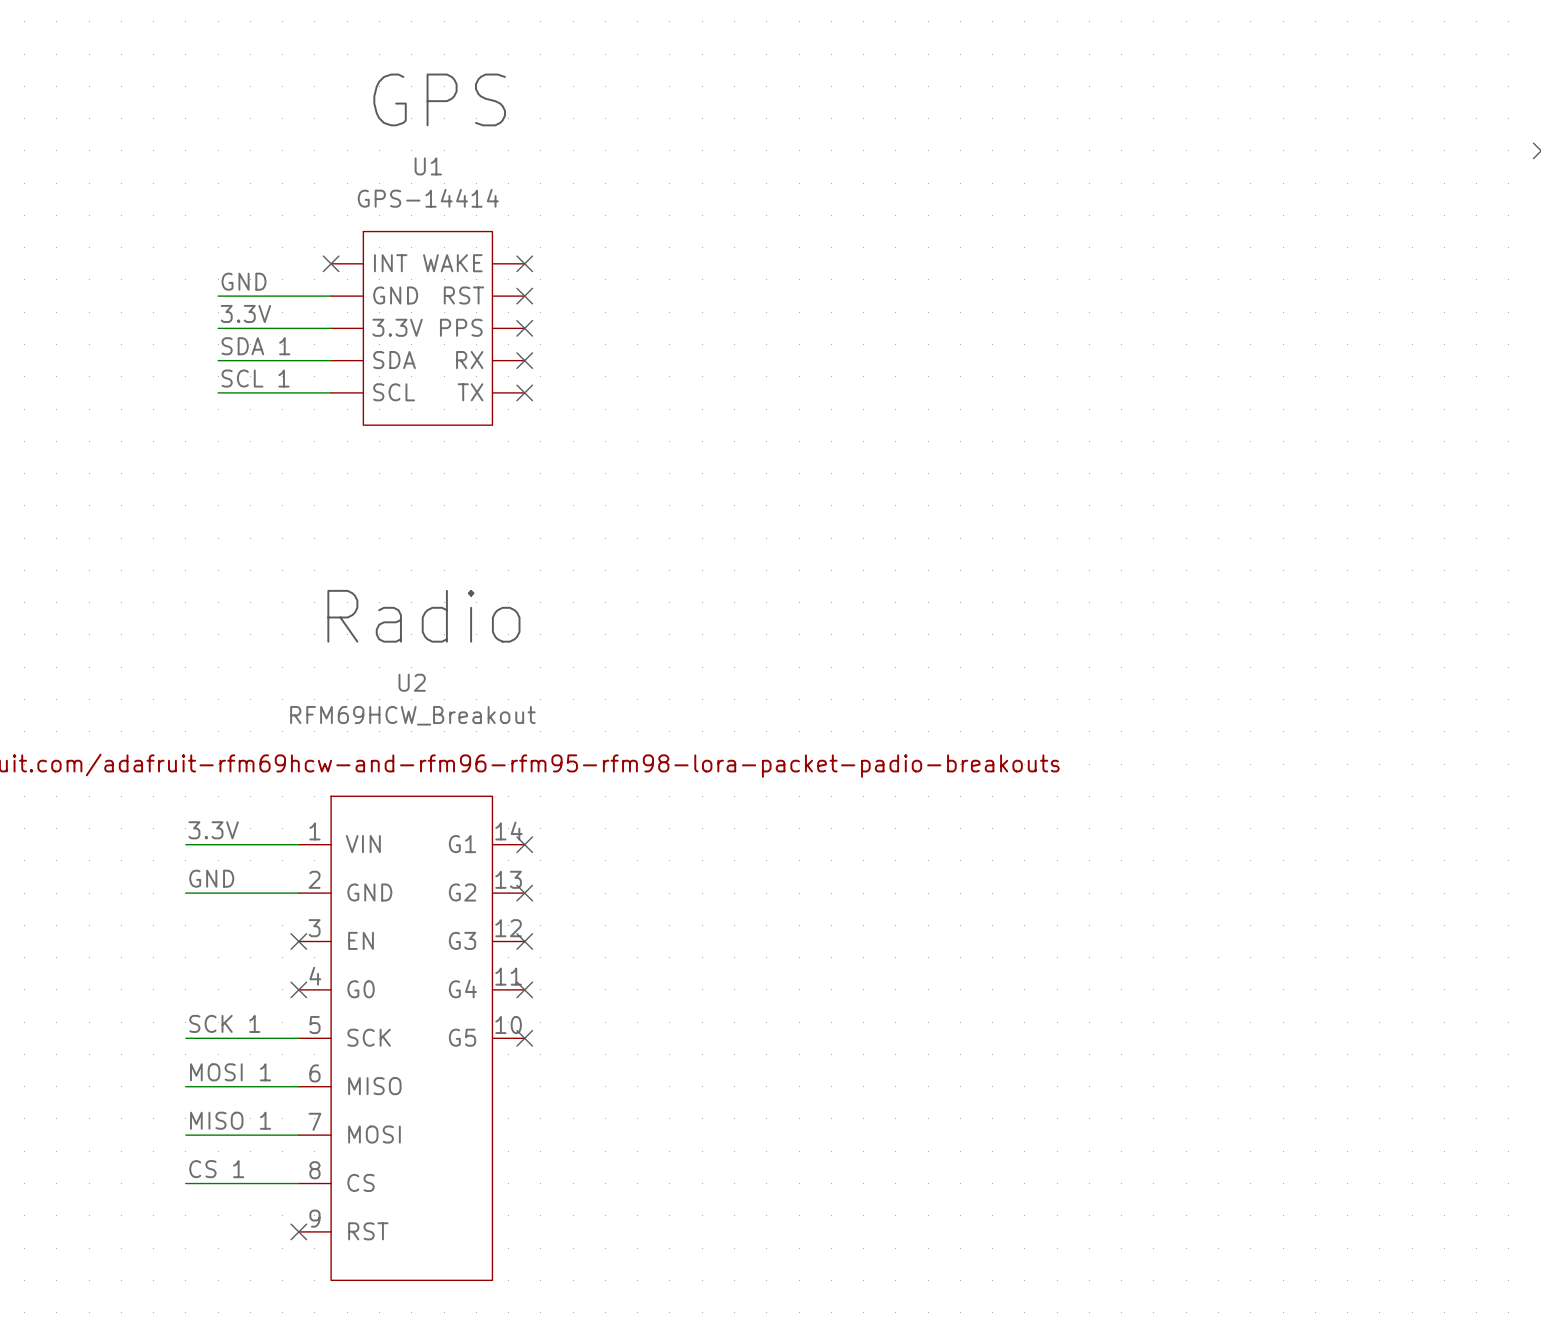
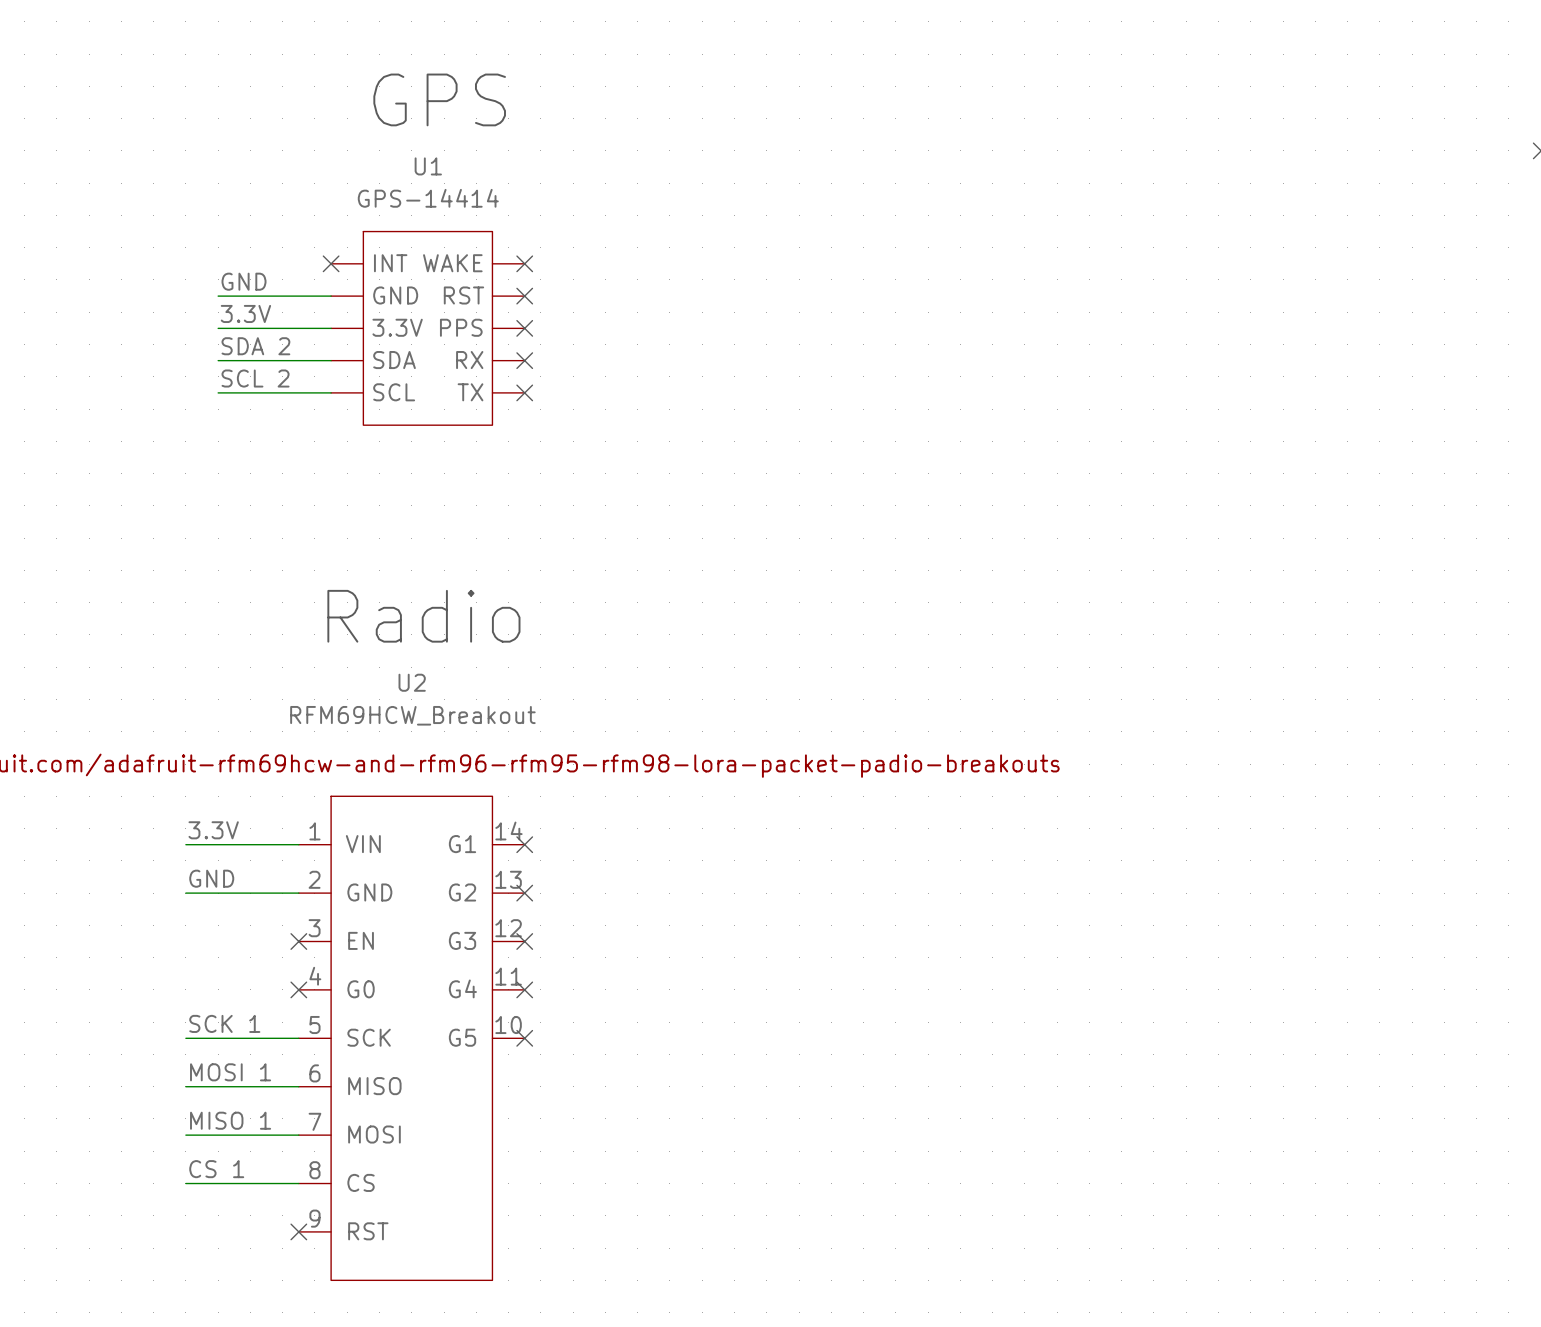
label: SDA 1 (255, 346) -> SDA 2 (255, 346)
label: SCL 1 (255, 378) -> SCL 2 (255, 378)

